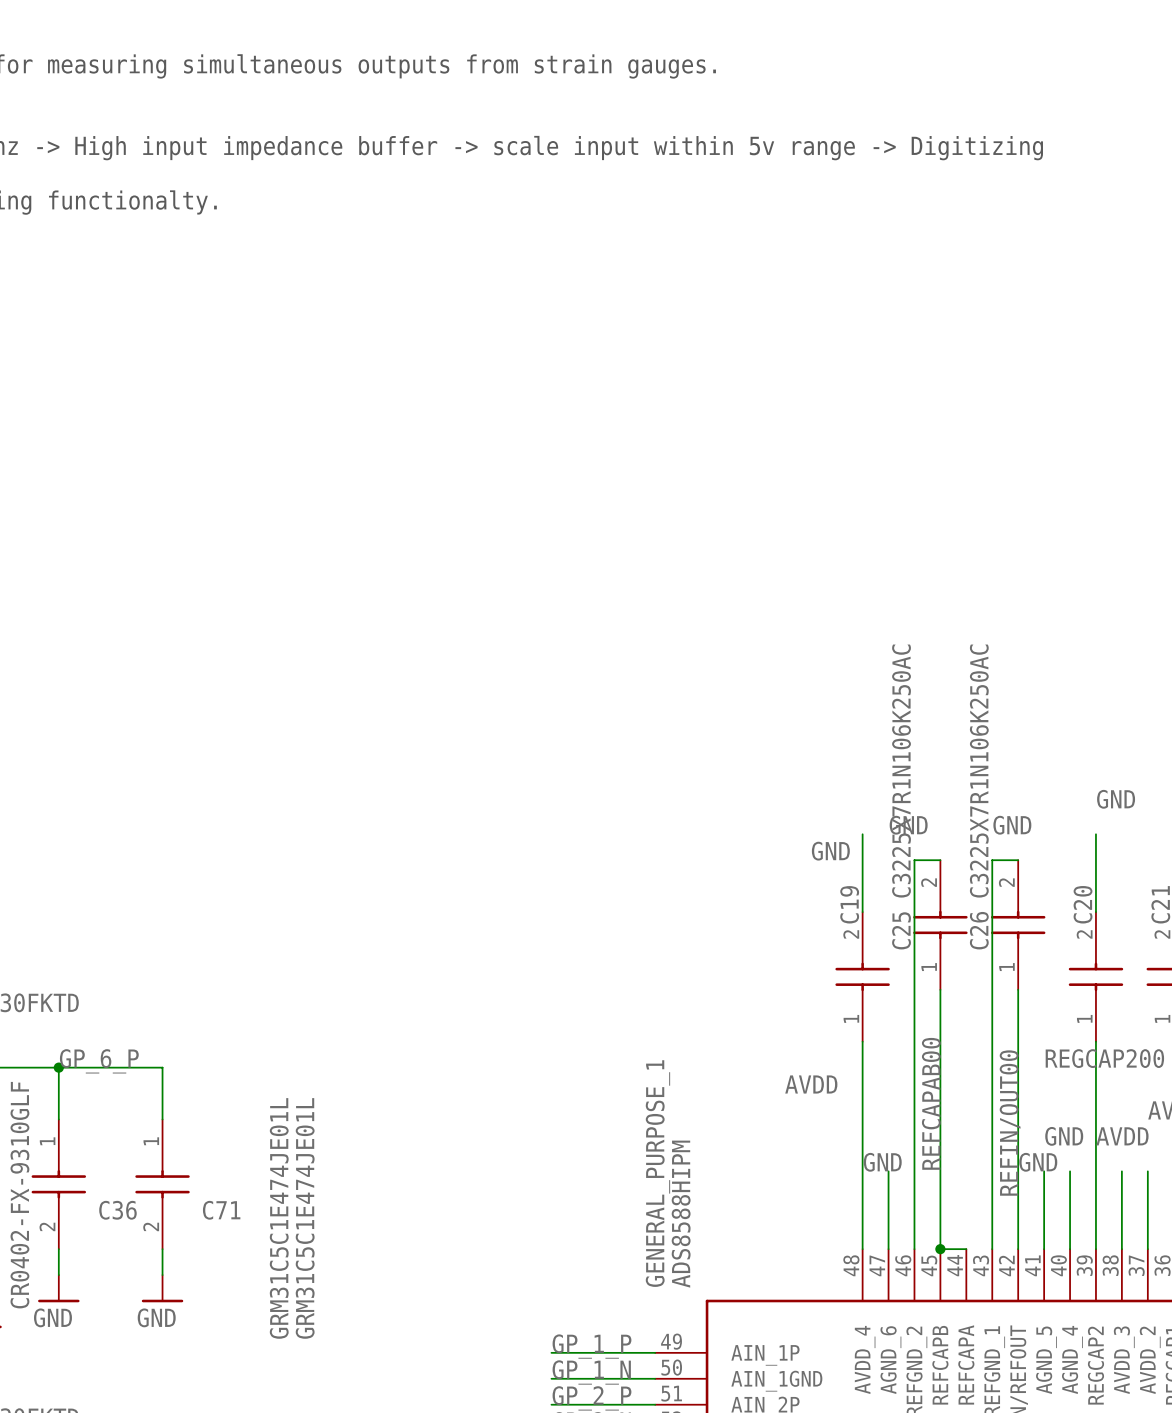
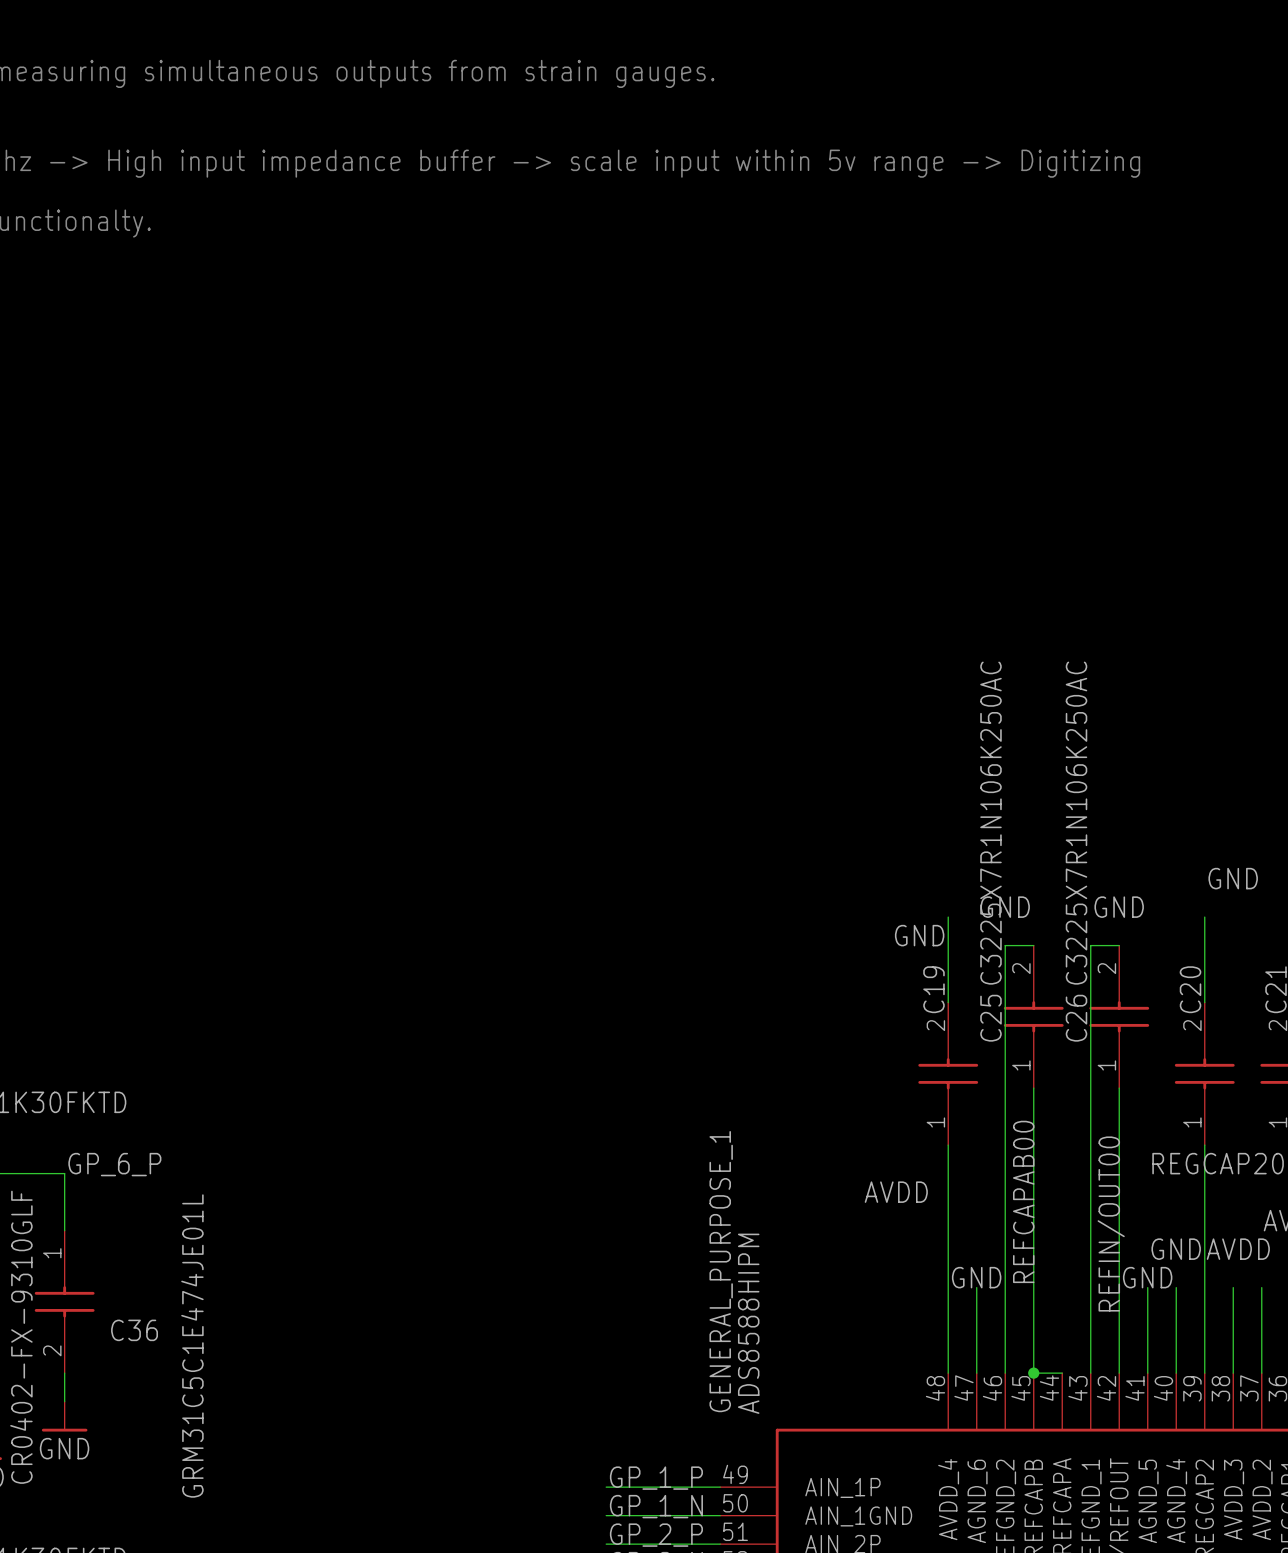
wire: (58, 1067) (162, 1067) (162, 1119) -> none
junction: (58, 1067) -> none
C71: GRM31C5C1E474JE01L (162, 1184) -> none
C36 value position: GRM31C5C1E474JE01L (305, 1218) -> GRM31C5C1E474JE01L (192, 1345)
wire: (162, 1249) (162, 1275) -> none
power symbol: GND (162, 1288) -> none

